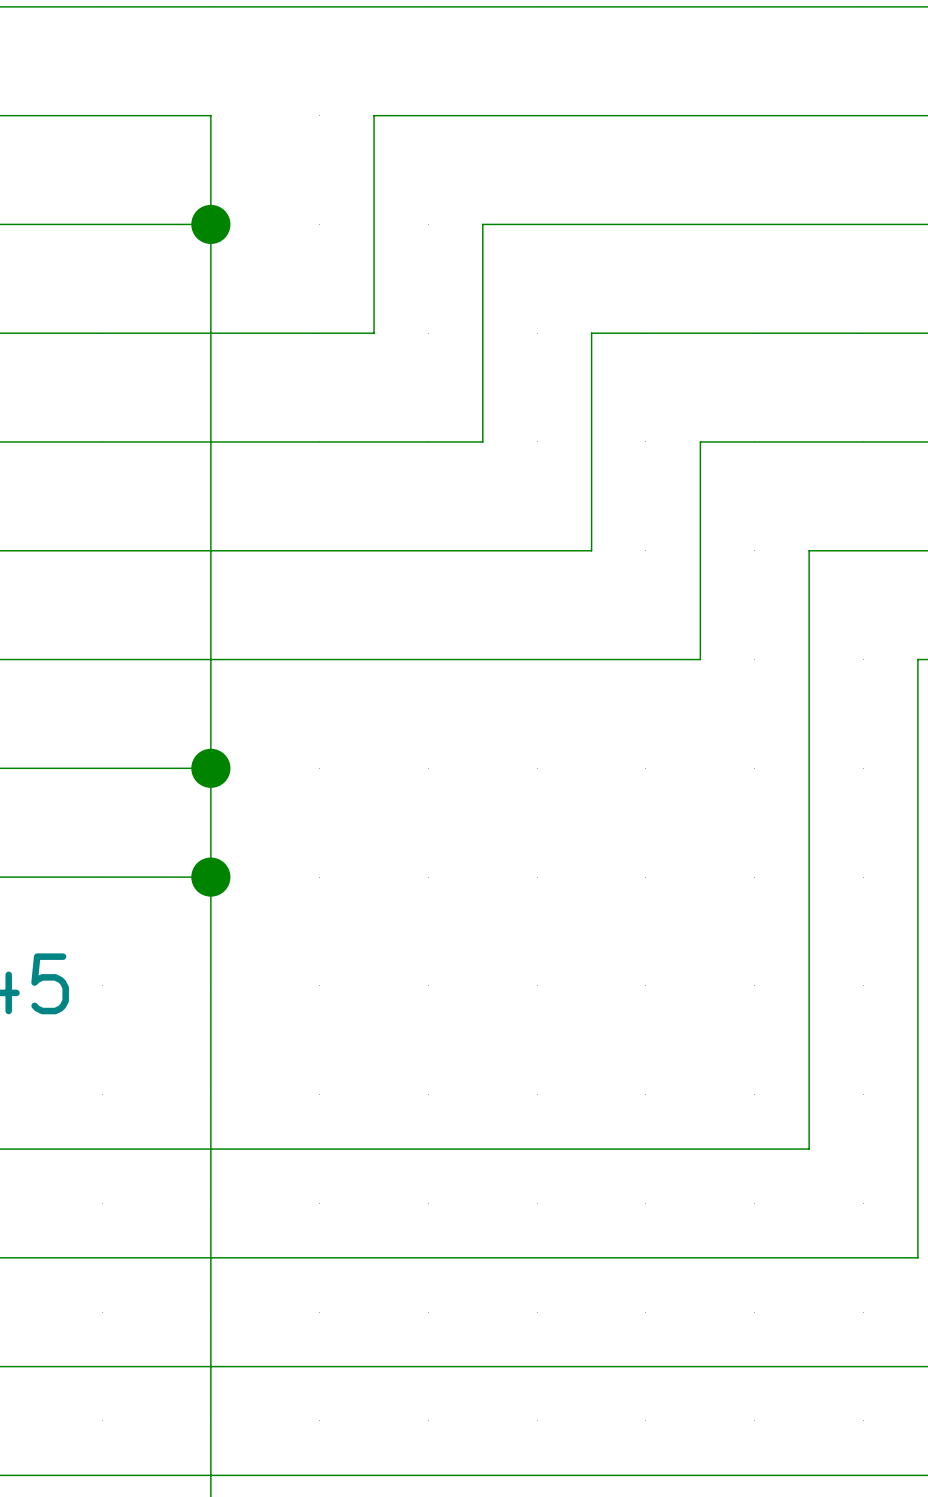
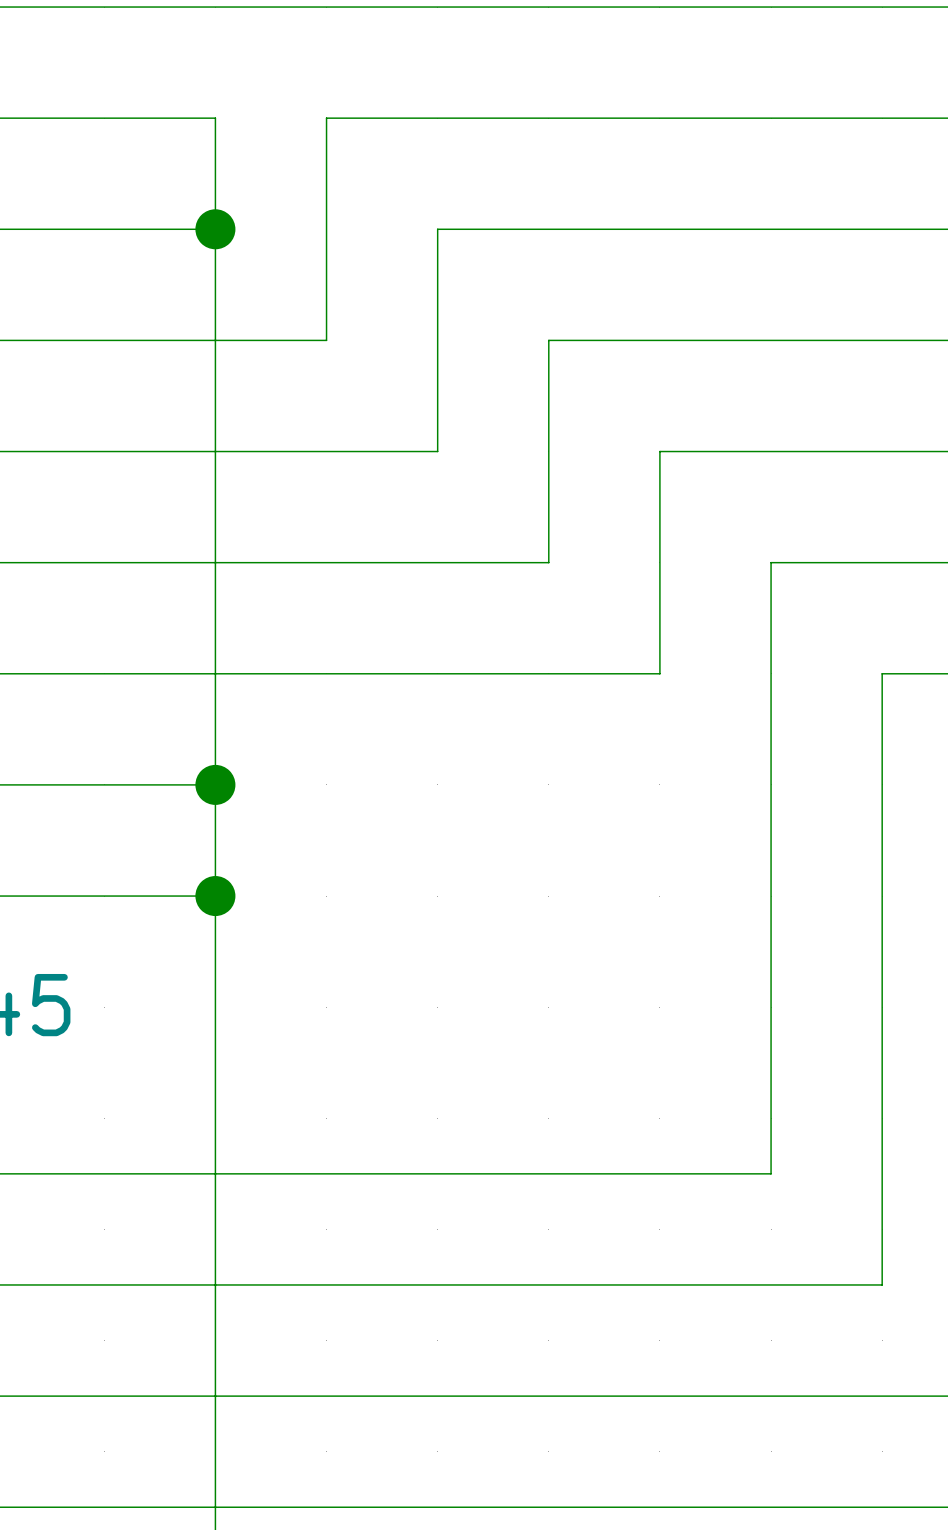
wire: (374, 115) (374, 333) (319, 333) -> (382, 118) (326, 118) (326, 340)
wire: (482, 224) (482, 441) (428, 441) -> (493, 229) (437, 229) (437, 451)
wire: (591, 333) (591, 550) (537, 550) -> (604, 340) (548, 340) (548, 562)
wire: (700, 441) (700, 659) (645, 659) -> (715, 451) (659, 451) (659, 673)
wire: (809, 550) (809, 1149) (754, 1149) -> (826, 562) (771, 562) (771, 1173)
wire: (917, 659) (917, 1257) (863, 1257) -> (937, 673) (882, 673) (882, 1284)

